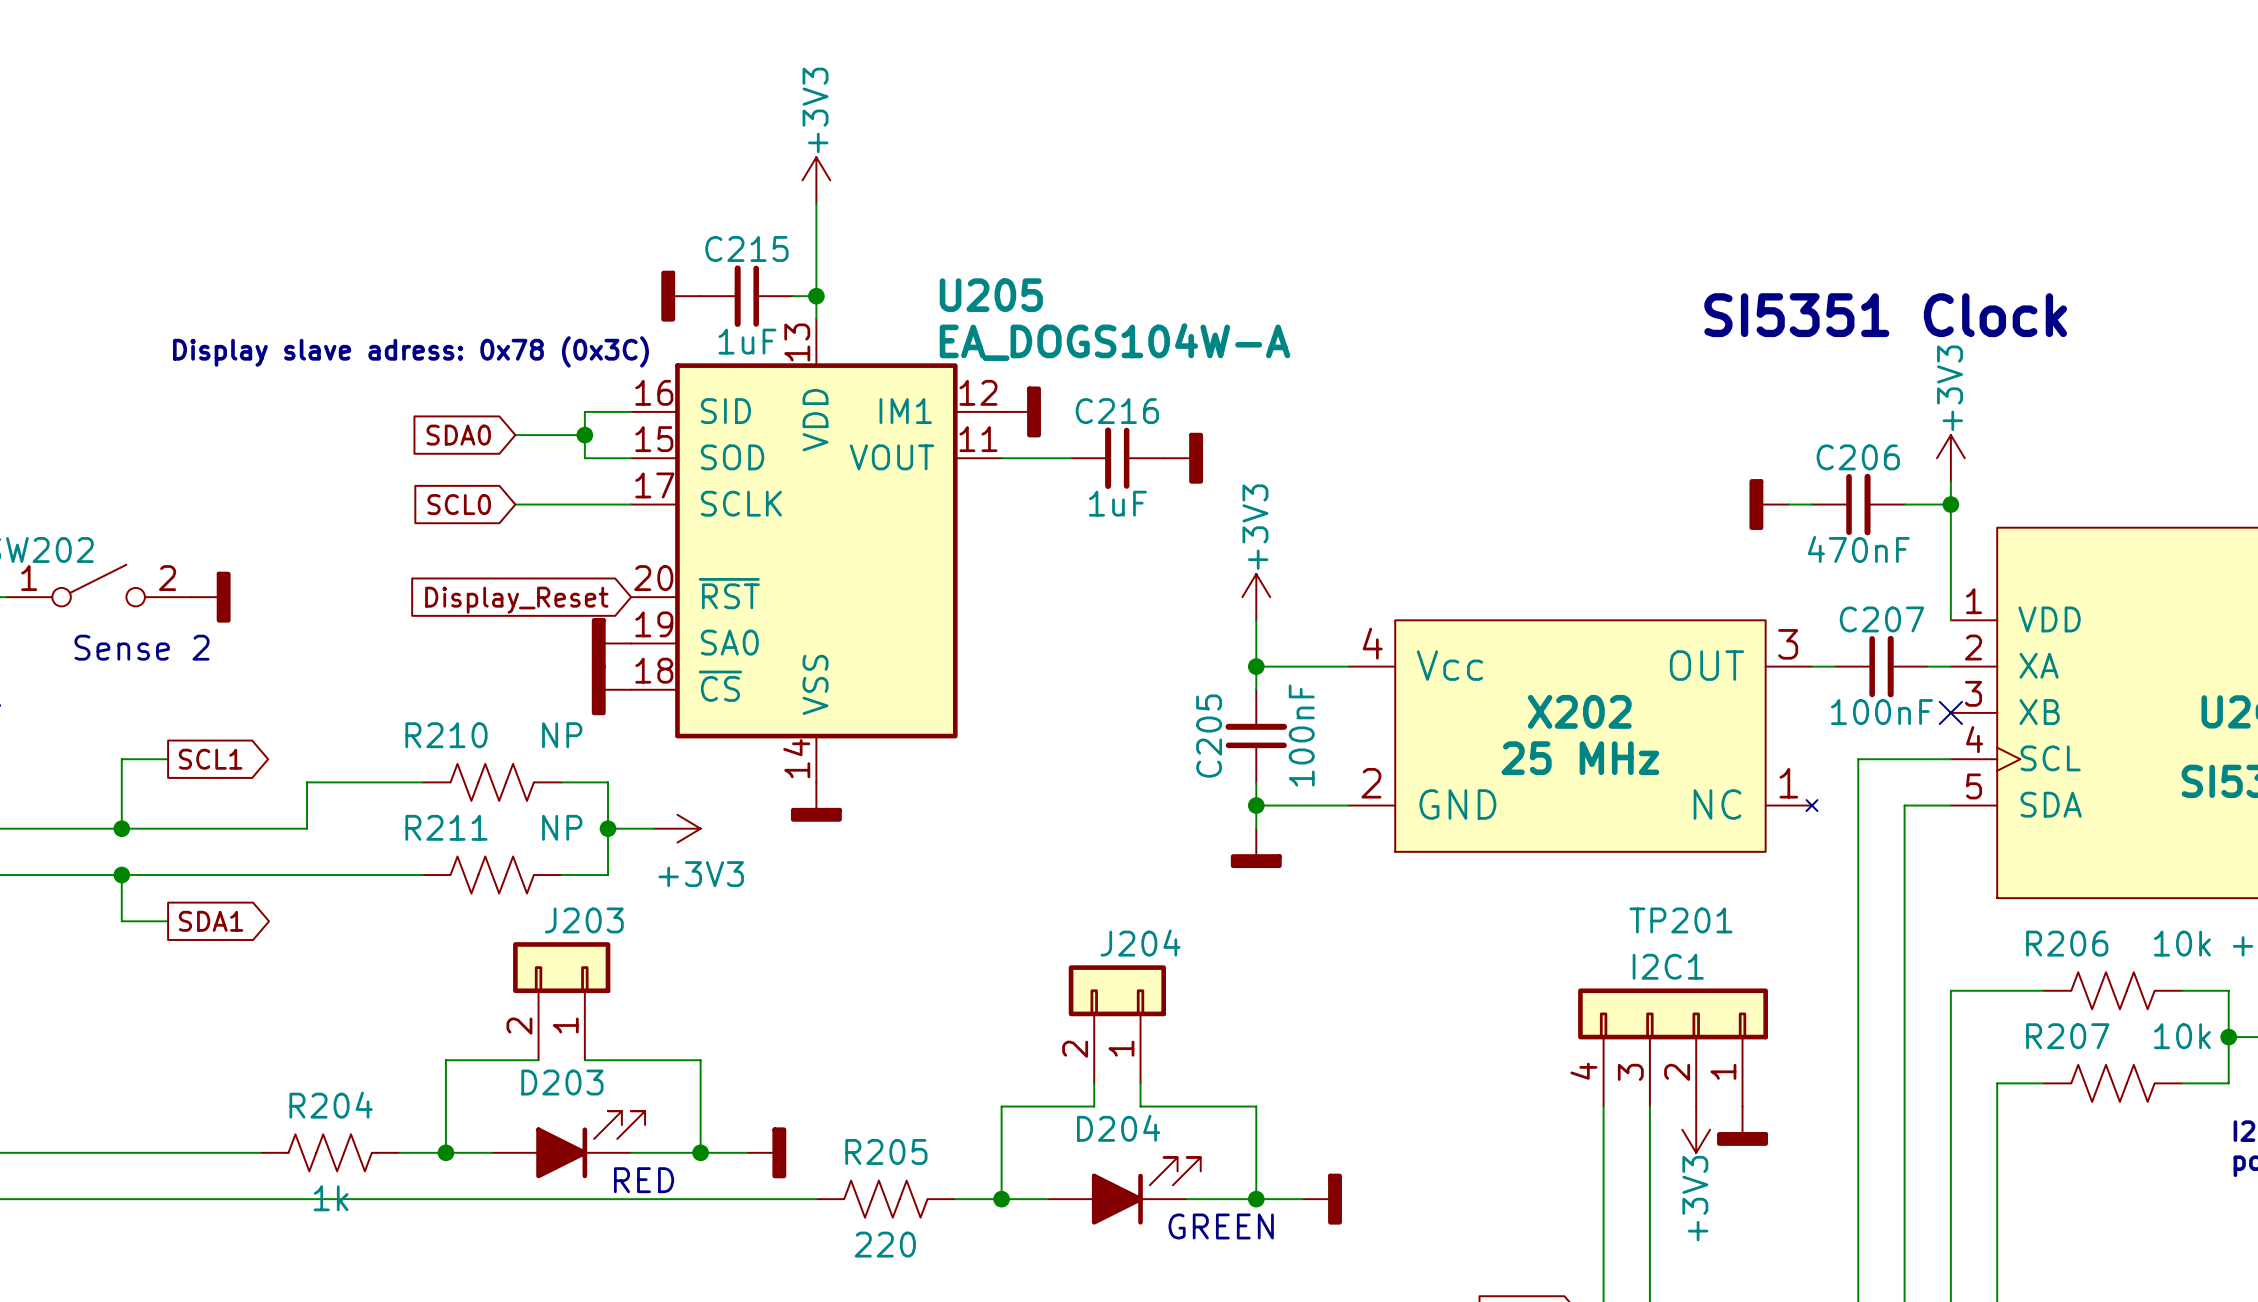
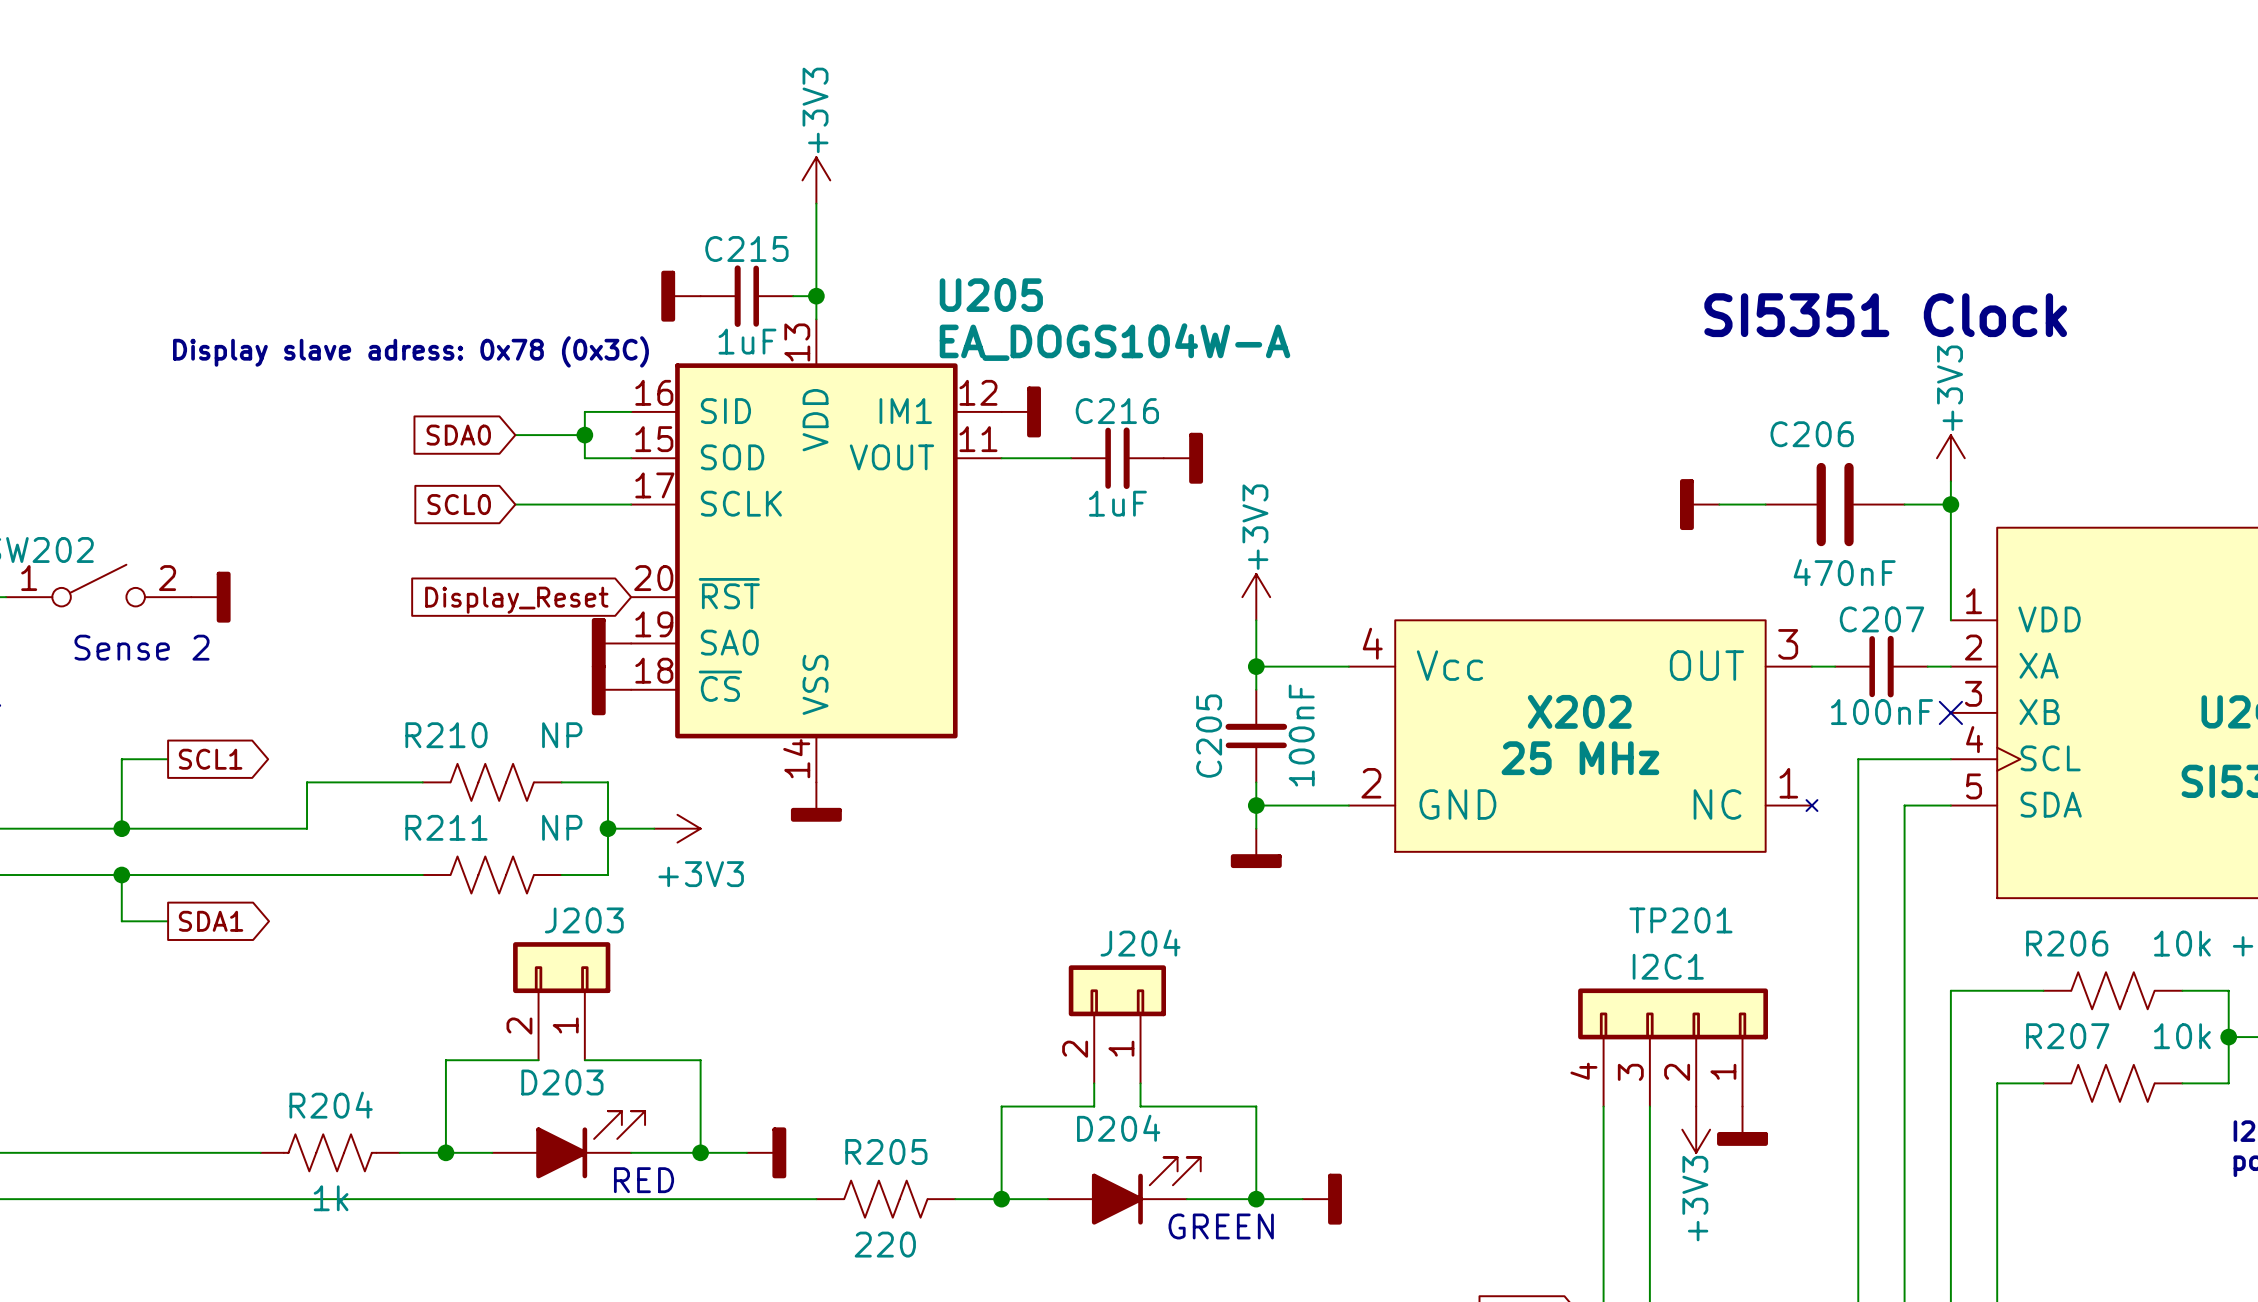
C216 rotation: 0° (1117, 458) -> 180° (1117, 458)
C206 symbol: [1811, 473, 1905, 536] -> [1765, 462, 1905, 547]
wire: none -> (1719, 504) (1765, 504)
power symbol position: (1769, 504) -> (1699, 504)

